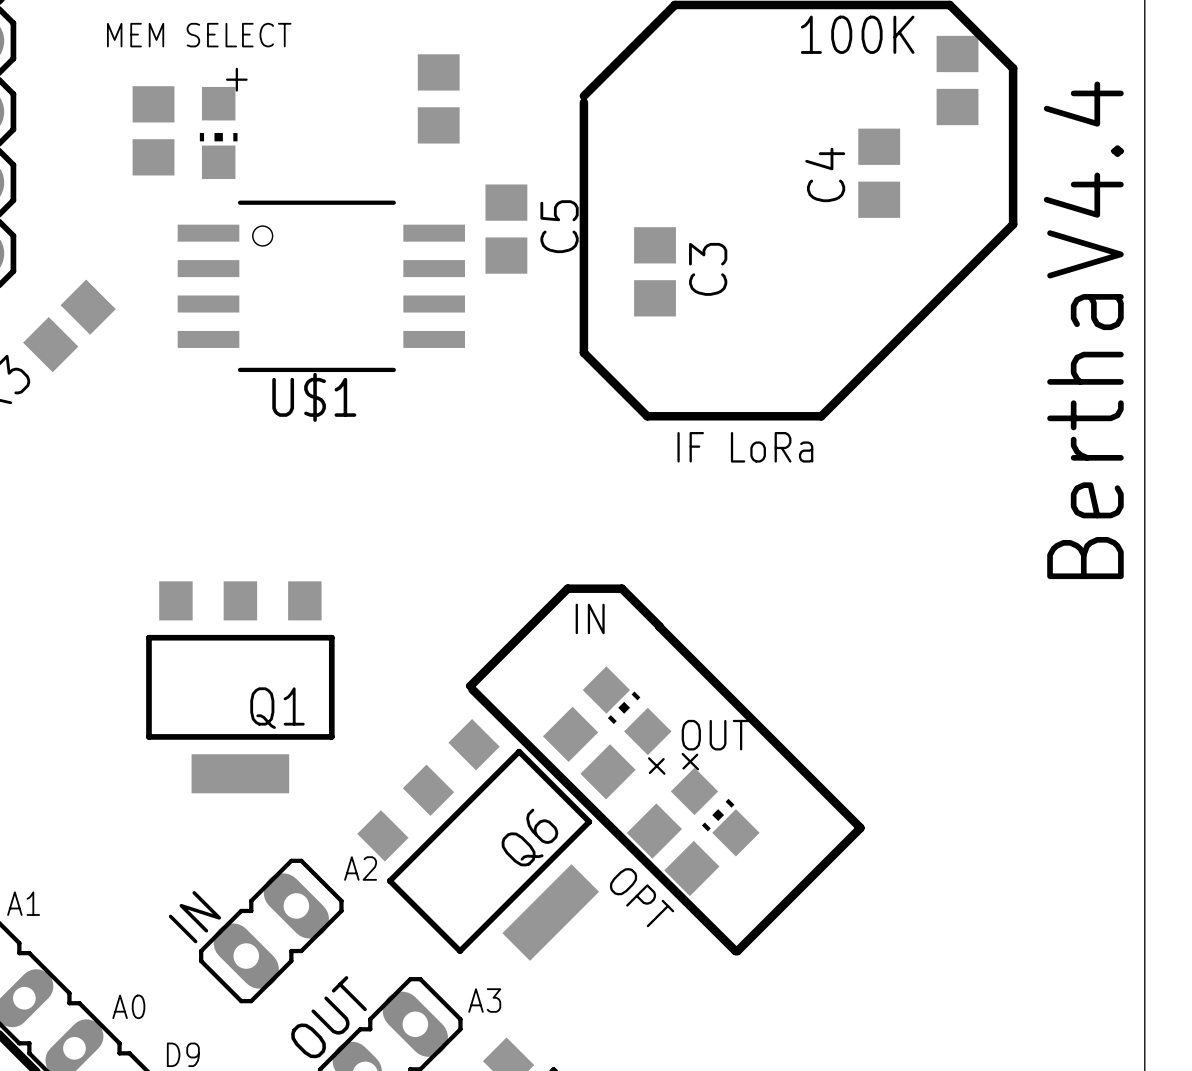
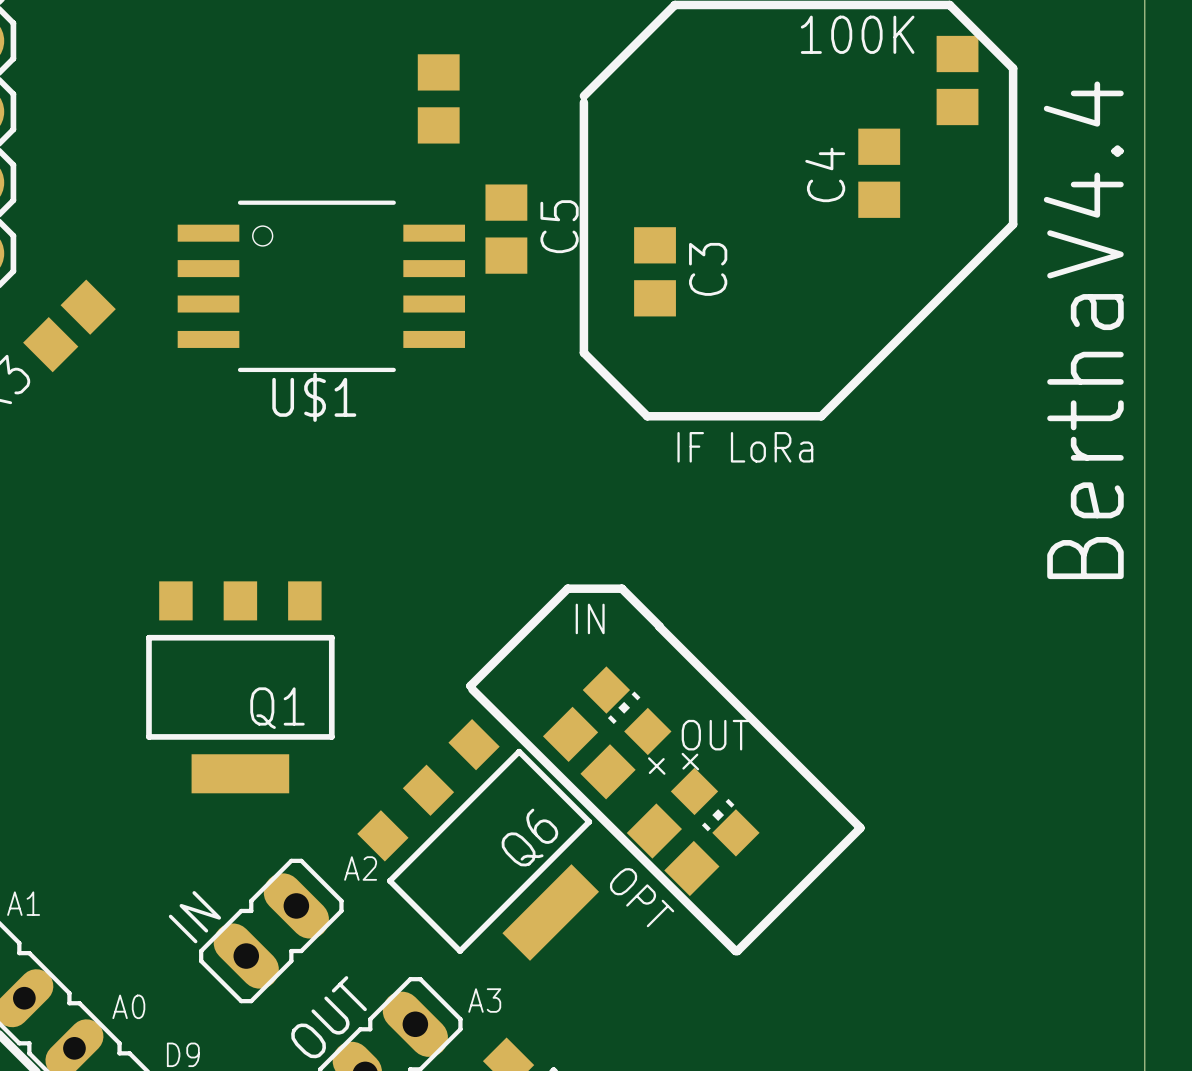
text: MEM SELECT (199, 35) -> none
part: (153, 130) -> none
part: (218, 132) -> none

